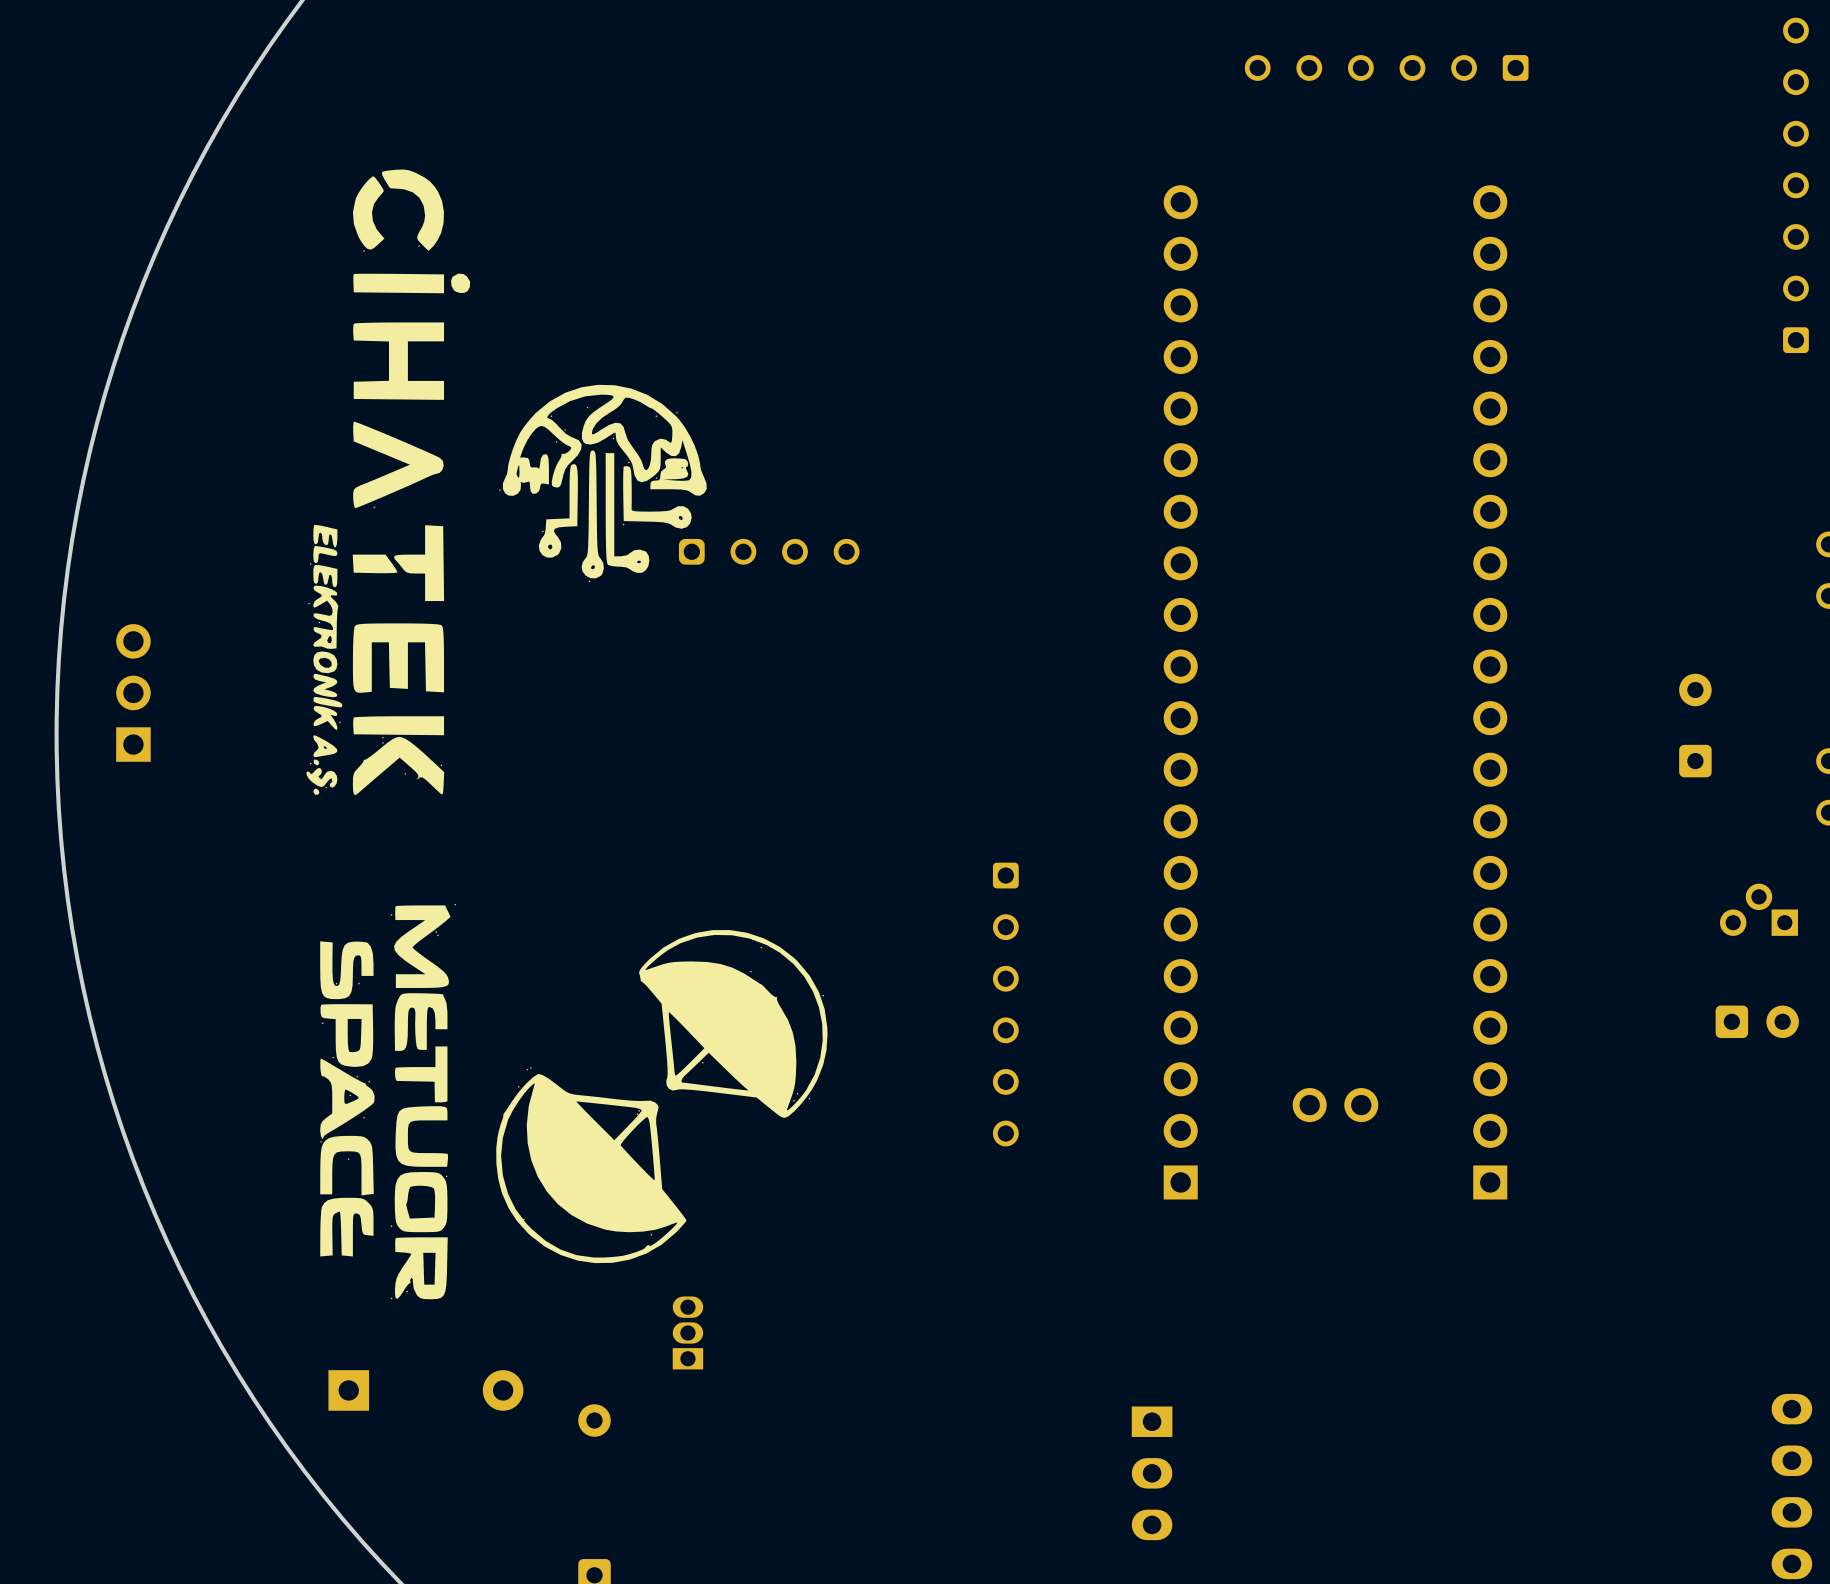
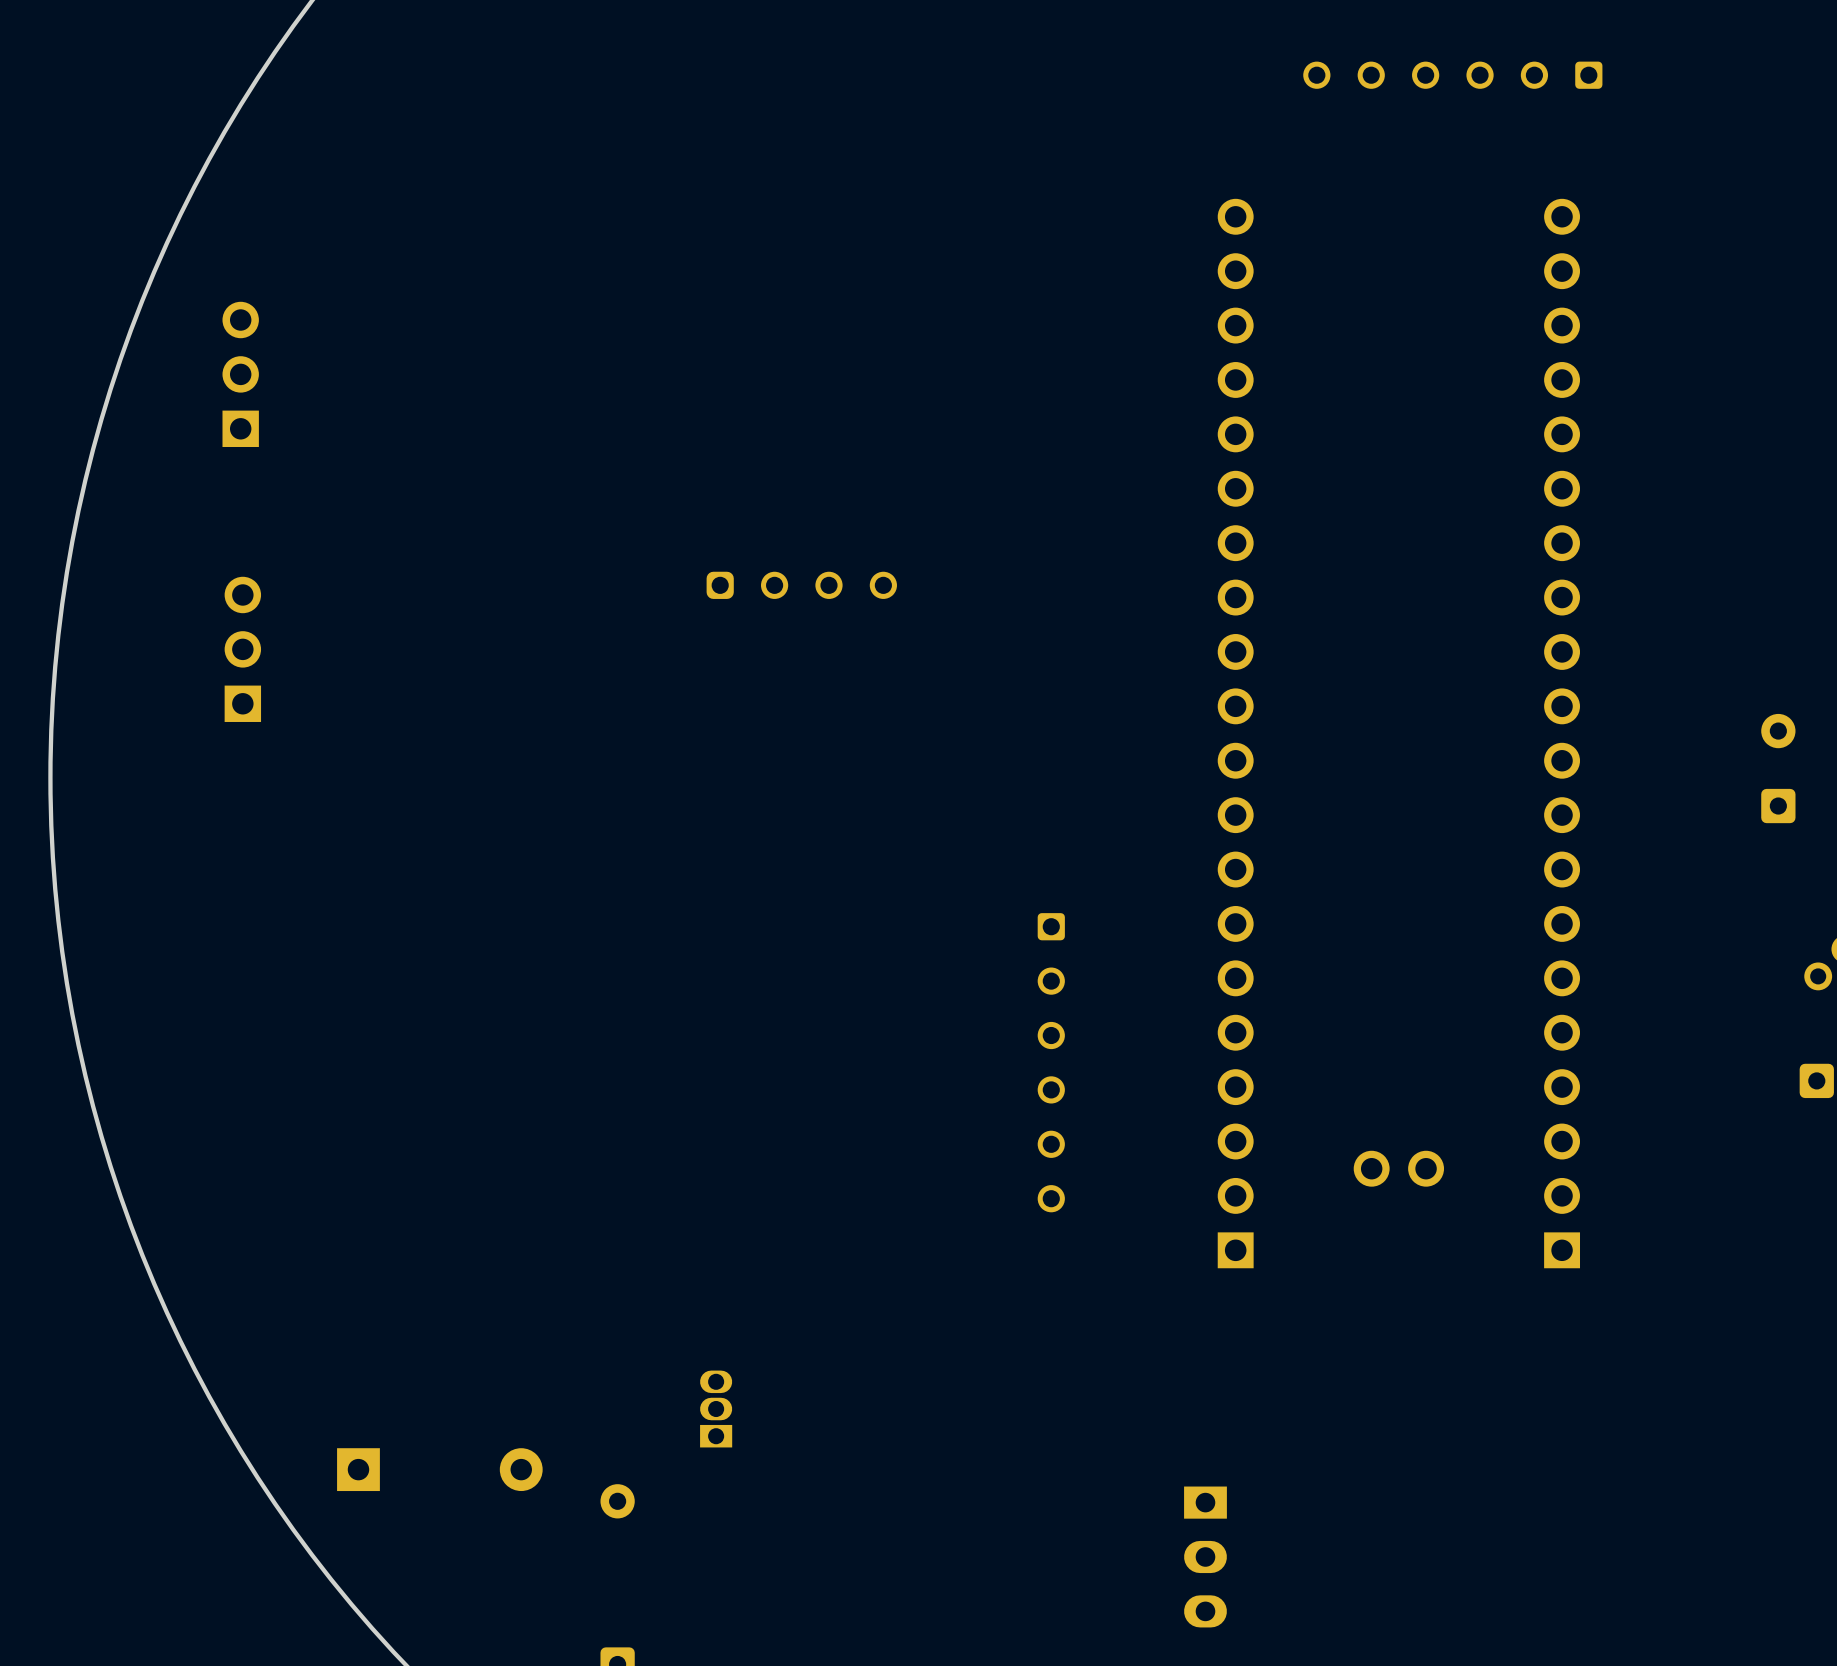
drawing: [306, 169, 828, 1300] -> none
part: none -> (240, 374)
part position: (133, 692) -> (242, 649)

